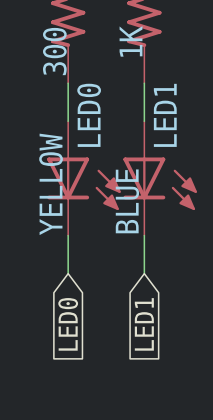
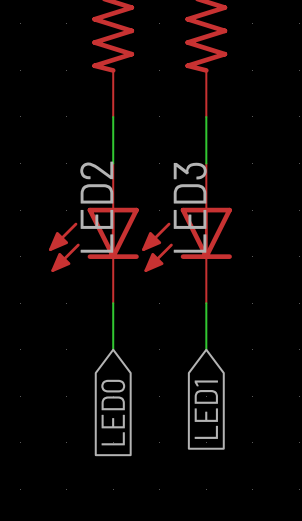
part value: 1K (131, 41) -> none
part value: 300 (54, 51) -> none
LED2: none -> (93, 233)
LED0: YELLOW (83, 178) -> none
LED3: none -> (187, 233)
LED1: BLUE (160, 178) -> none

